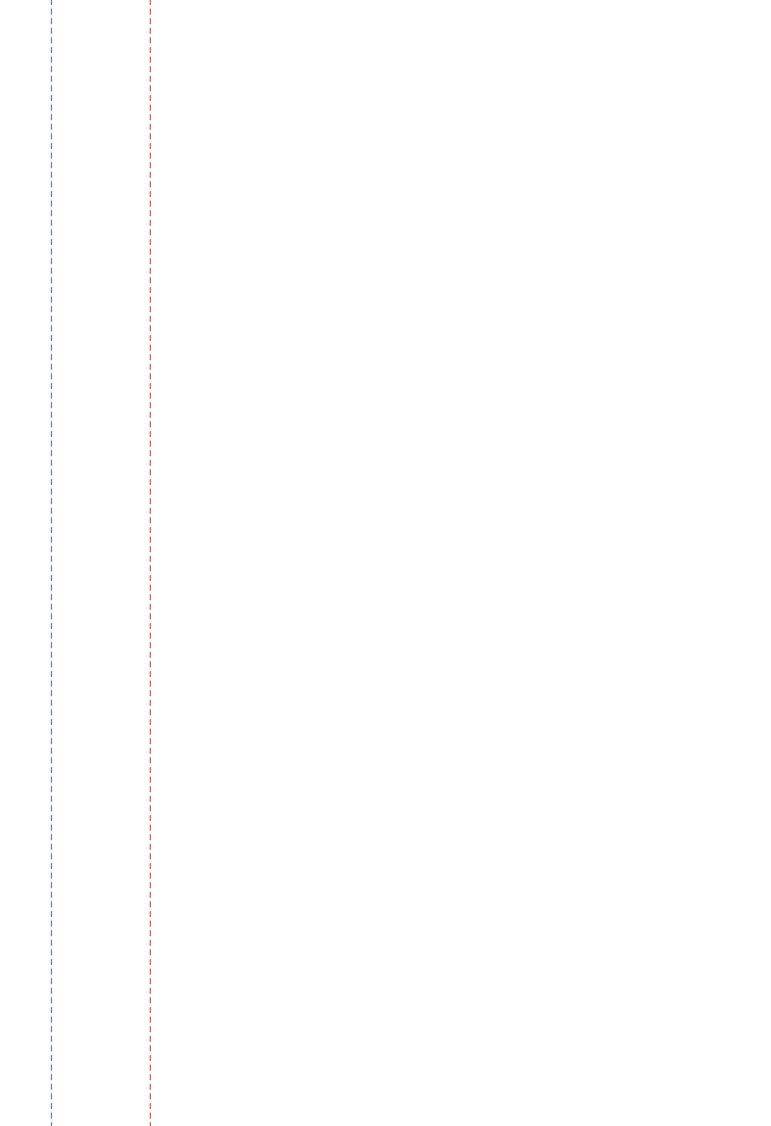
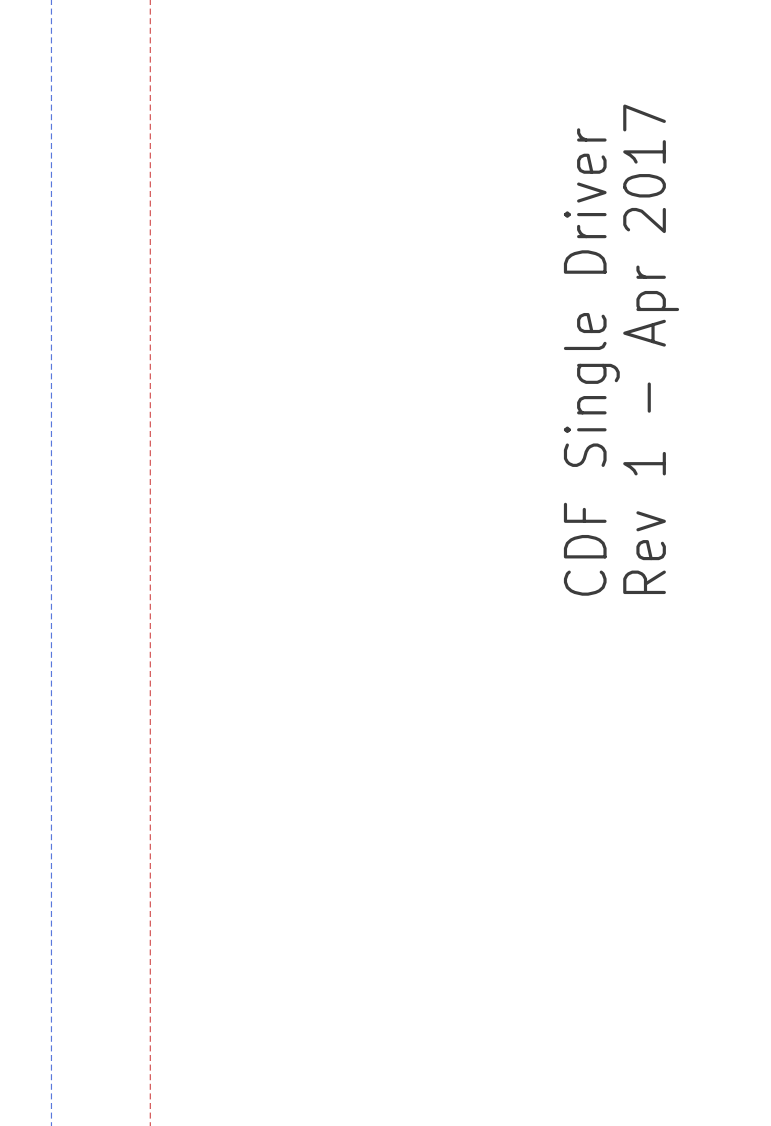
text: none -> Rev 1 - Apr 2017 (651, 349)
text: none -> CDF Single Driver (591, 362)

